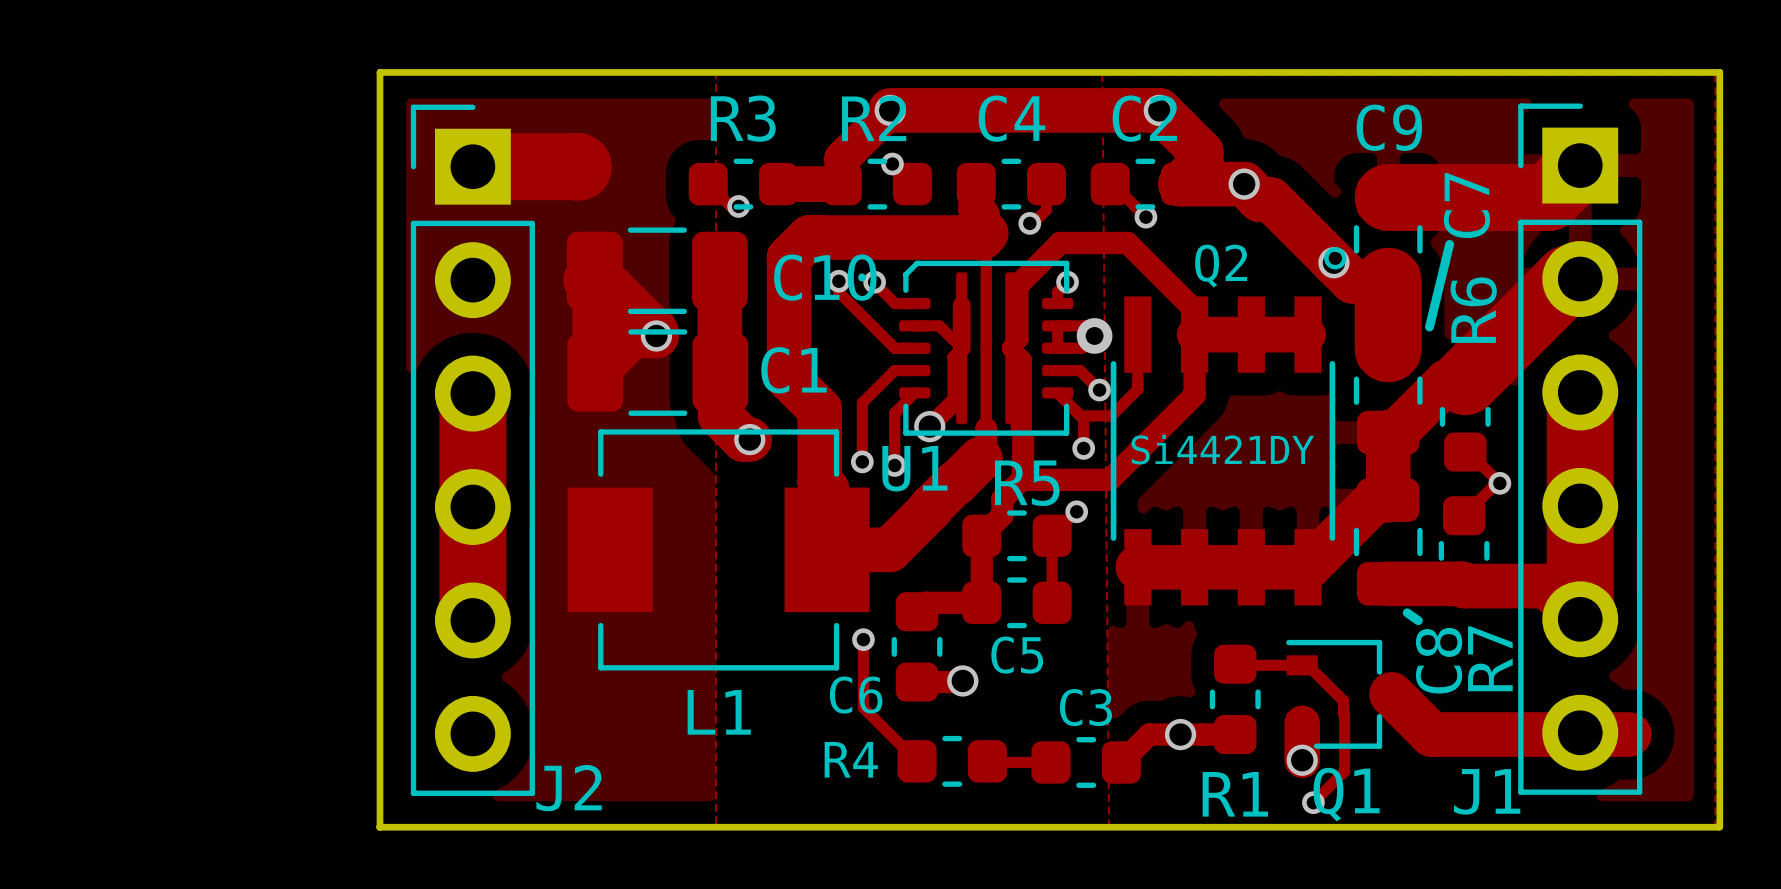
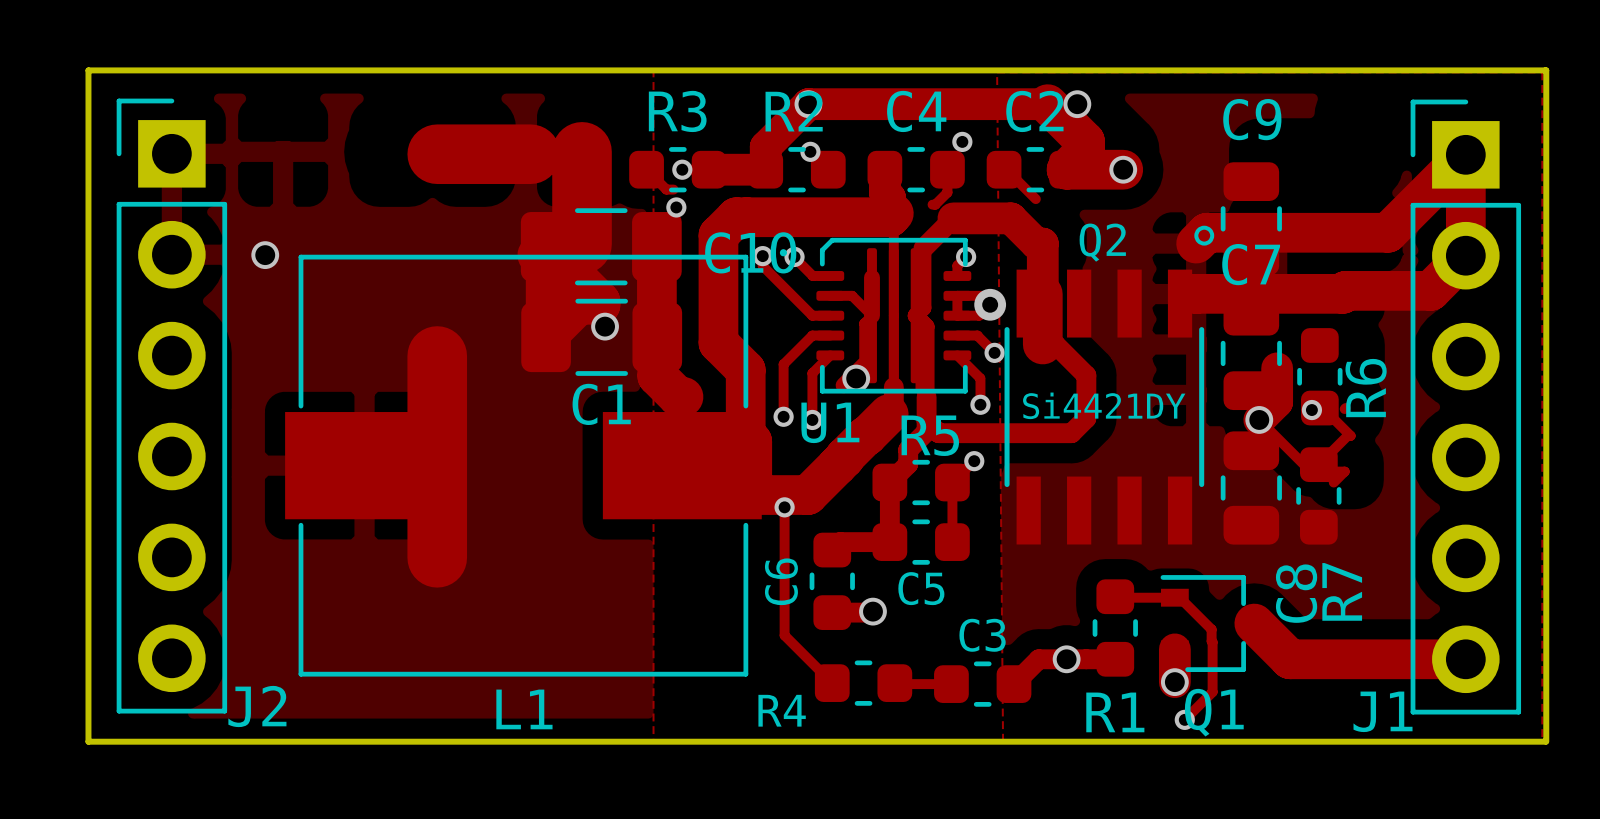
board edge: (380, 72) (380, 827) -> (354, 70) (88, 70) (88, 741) (354, 741)
track width: thick (890, 110) (1159, 110) -> thin (808, 104) (1047, 104)
via position: (1159, 110) -> (1077, 104)
via: none -> (962, 141)
track: none -> (582, 151) (582, 244)
track: (1580, 165) (1548, 197) (1388, 197) -> none
via: none -> (682, 169)
track: (1244, 184) (1259, 199) (1270, 199) (1352, 281) (1388, 281) (1388, 348) -> none
C7 name rotation: 0° (1466, 205) -> 90° clockwise (1251, 264)
C7 name position: C7 (1466, 205) -> C7 (1251, 264)
via: (738, 206) -> none
via: (1145, 217) -> none
via: (1029, 223) -> none
via: none -> (676, 207)
line: (1449, 244) (1429, 327) -> none
via: (1333, 262) -> none
track: none -> (1196, 243) (1206, 232) (1387, 232) (1465, 154) (1465, 255) (1430, 290) (1345, 290) (1342, 293) (1196, 293)
track: (1580, 279) (1567, 279) (1465, 381) (1446, 381) (1396, 432) (1388, 432) (1388, 500) (1375, 500) (1308, 567) (1137, 567) -> none
via: none -> (265, 255)
track: (1019, 283) (1060, 242) (1127, 242) (1194, 310) (1194, 395) (1109, 479) (1023, 478) -> (923, 258) (923, 248) (953, 218) (1011, 218) (1036, 243) (1042, 243) (1042, 344) (1055, 344) (1086, 375) (1086, 418) (1071, 433) (938, 433) (926, 420)
R6 name position: R6 (1473, 310) -> R6 (1366, 388)
track: (1137, 334) (1137, 389) (1111, 415) (1080, 415) -> none
track: (1194, 334) (1308, 334) -> none
via position: (656, 335) -> (605, 326)
C1 name position: C1 (794, 370) -> C1 (601, 404)
track: (1580, 392) (1580, 619) (1546, 586) (1388, 583) -> none
track: none -> (1277, 368) (1277, 402) (1259, 419) (1310, 471) (1344, 471) (1333, 482)
via position: (929, 426) -> (856, 378)
L1 footprint: [567, 429, 870, 671] -> [285, 254, 762, 677]
via: (749, 439) -> none
J1 position: (1580, 449) -> (1465, 407)
J2 position: (472, 450) -> (171, 406)
track: none -> (1345, 408) (1344, 409)
via: none -> (1259, 419)
via position: (1499, 483) -> (1311, 410)
track: none -> (784, 507) (784, 574)
line: (1407, 612) (1418, 620) -> none
via position: (863, 639) -> (784, 507)
C6 name rotation: 0° (856, 695) -> 90° counterclockwise (781, 581)
L1 name position: L1 (719, 712) -> L1 (524, 709)
R4 name position: R4 (851, 759) -> R4 (782, 710)

